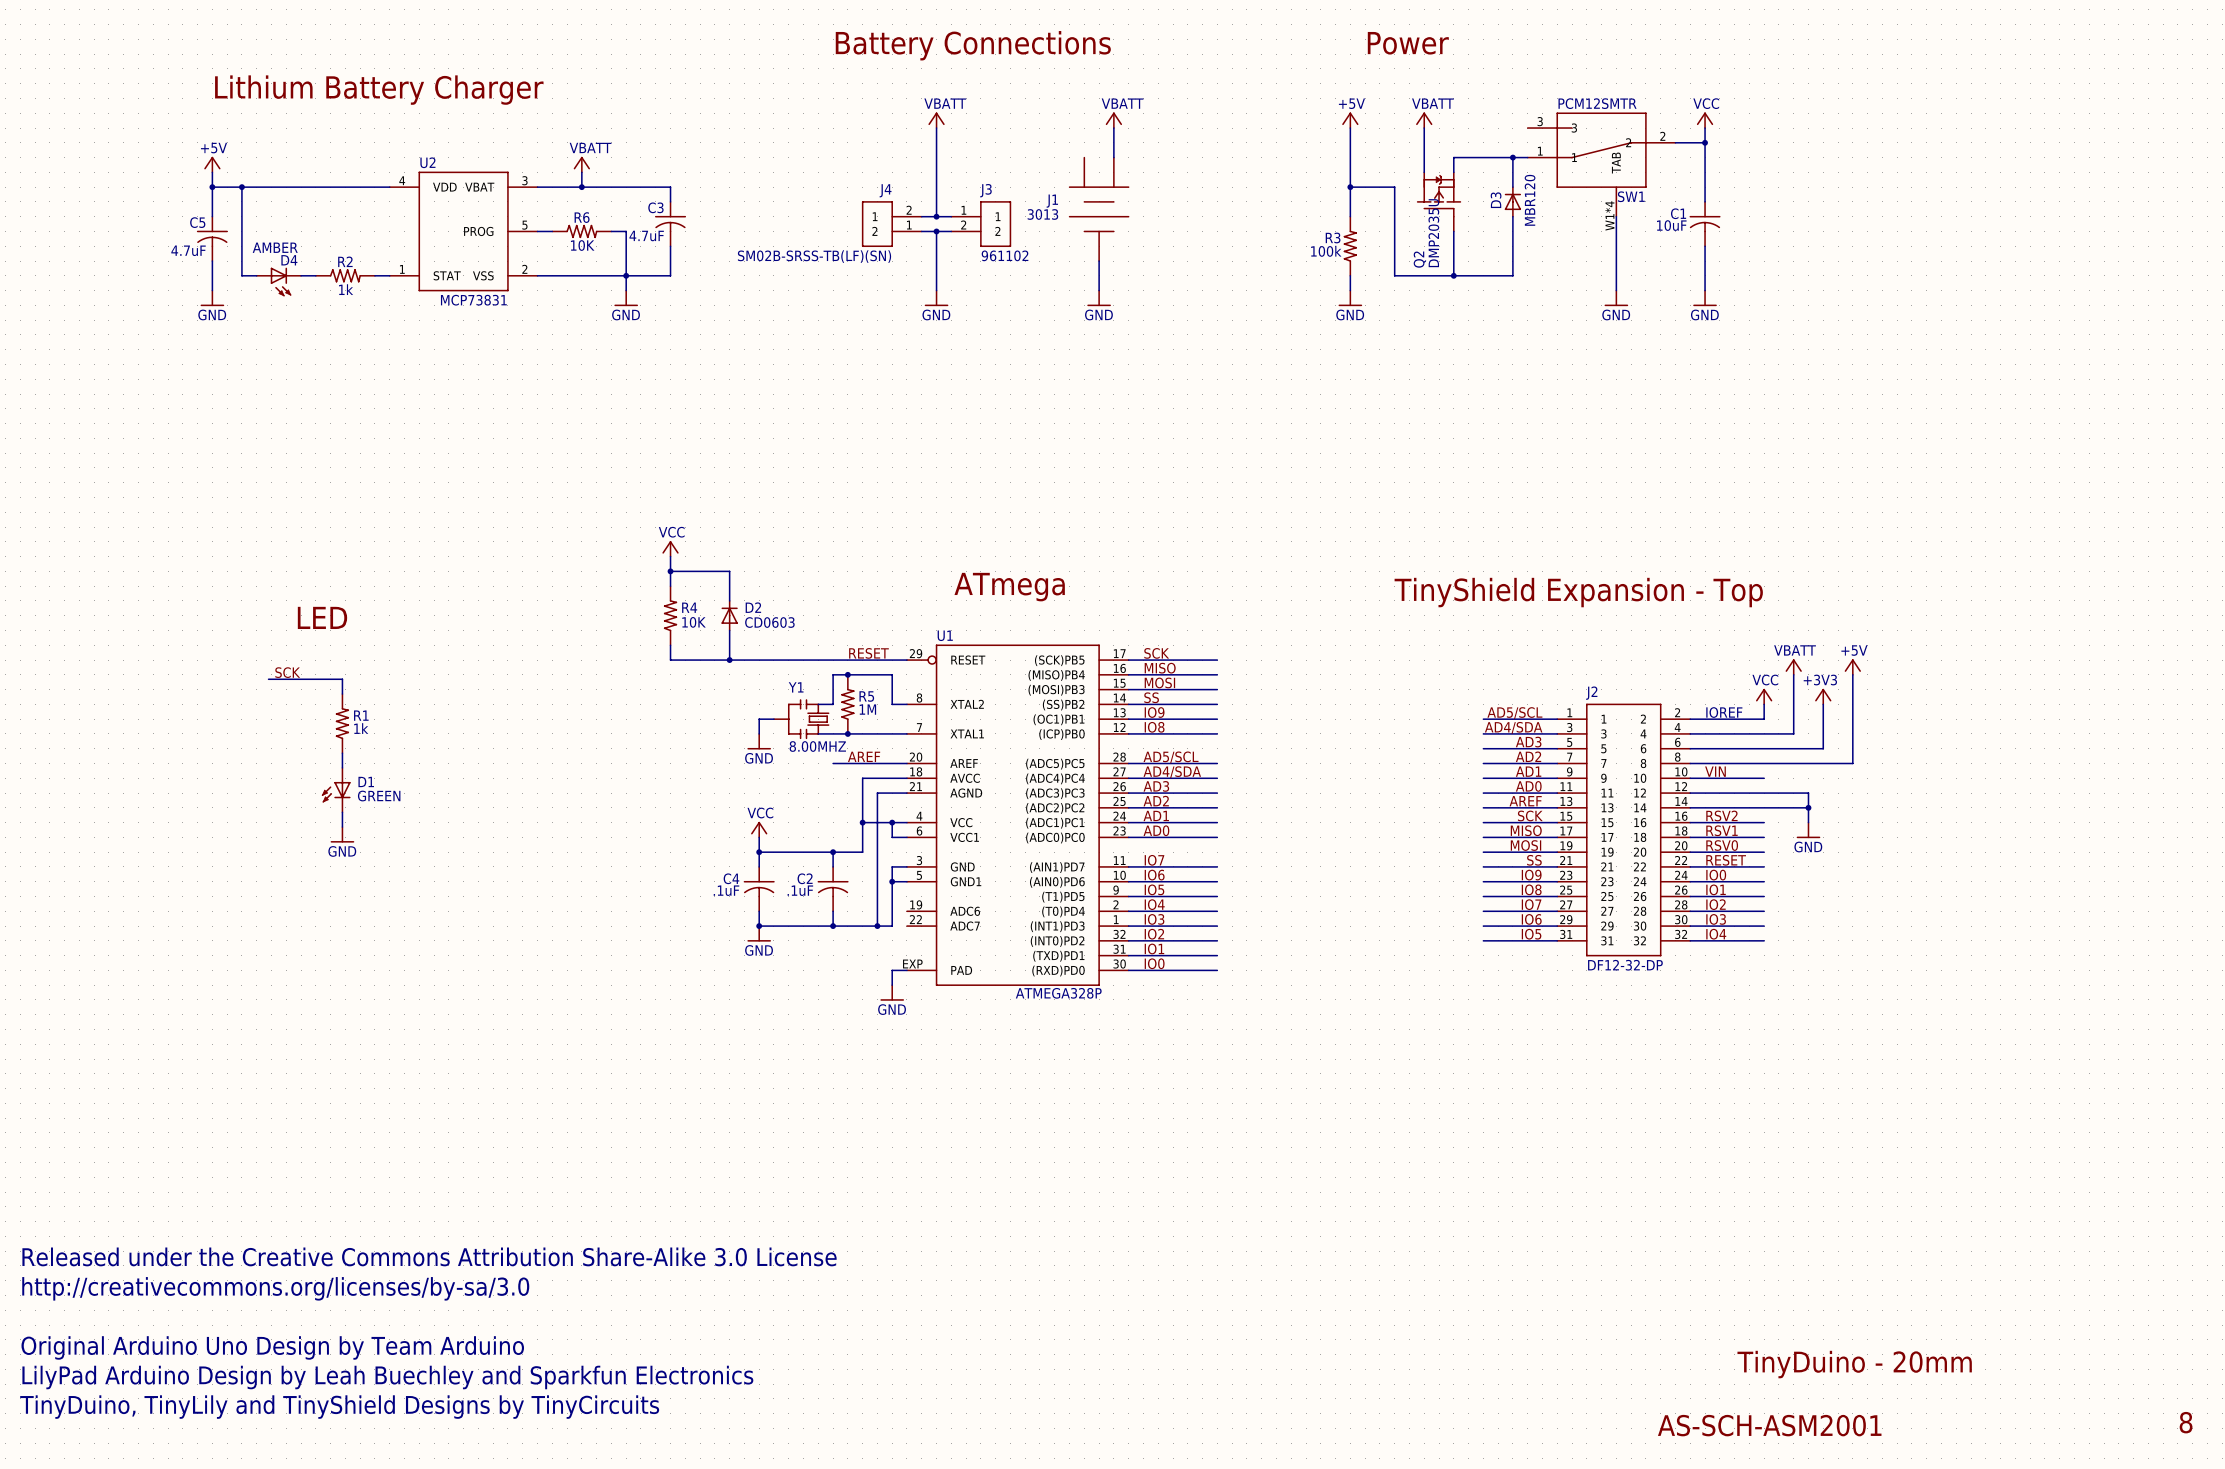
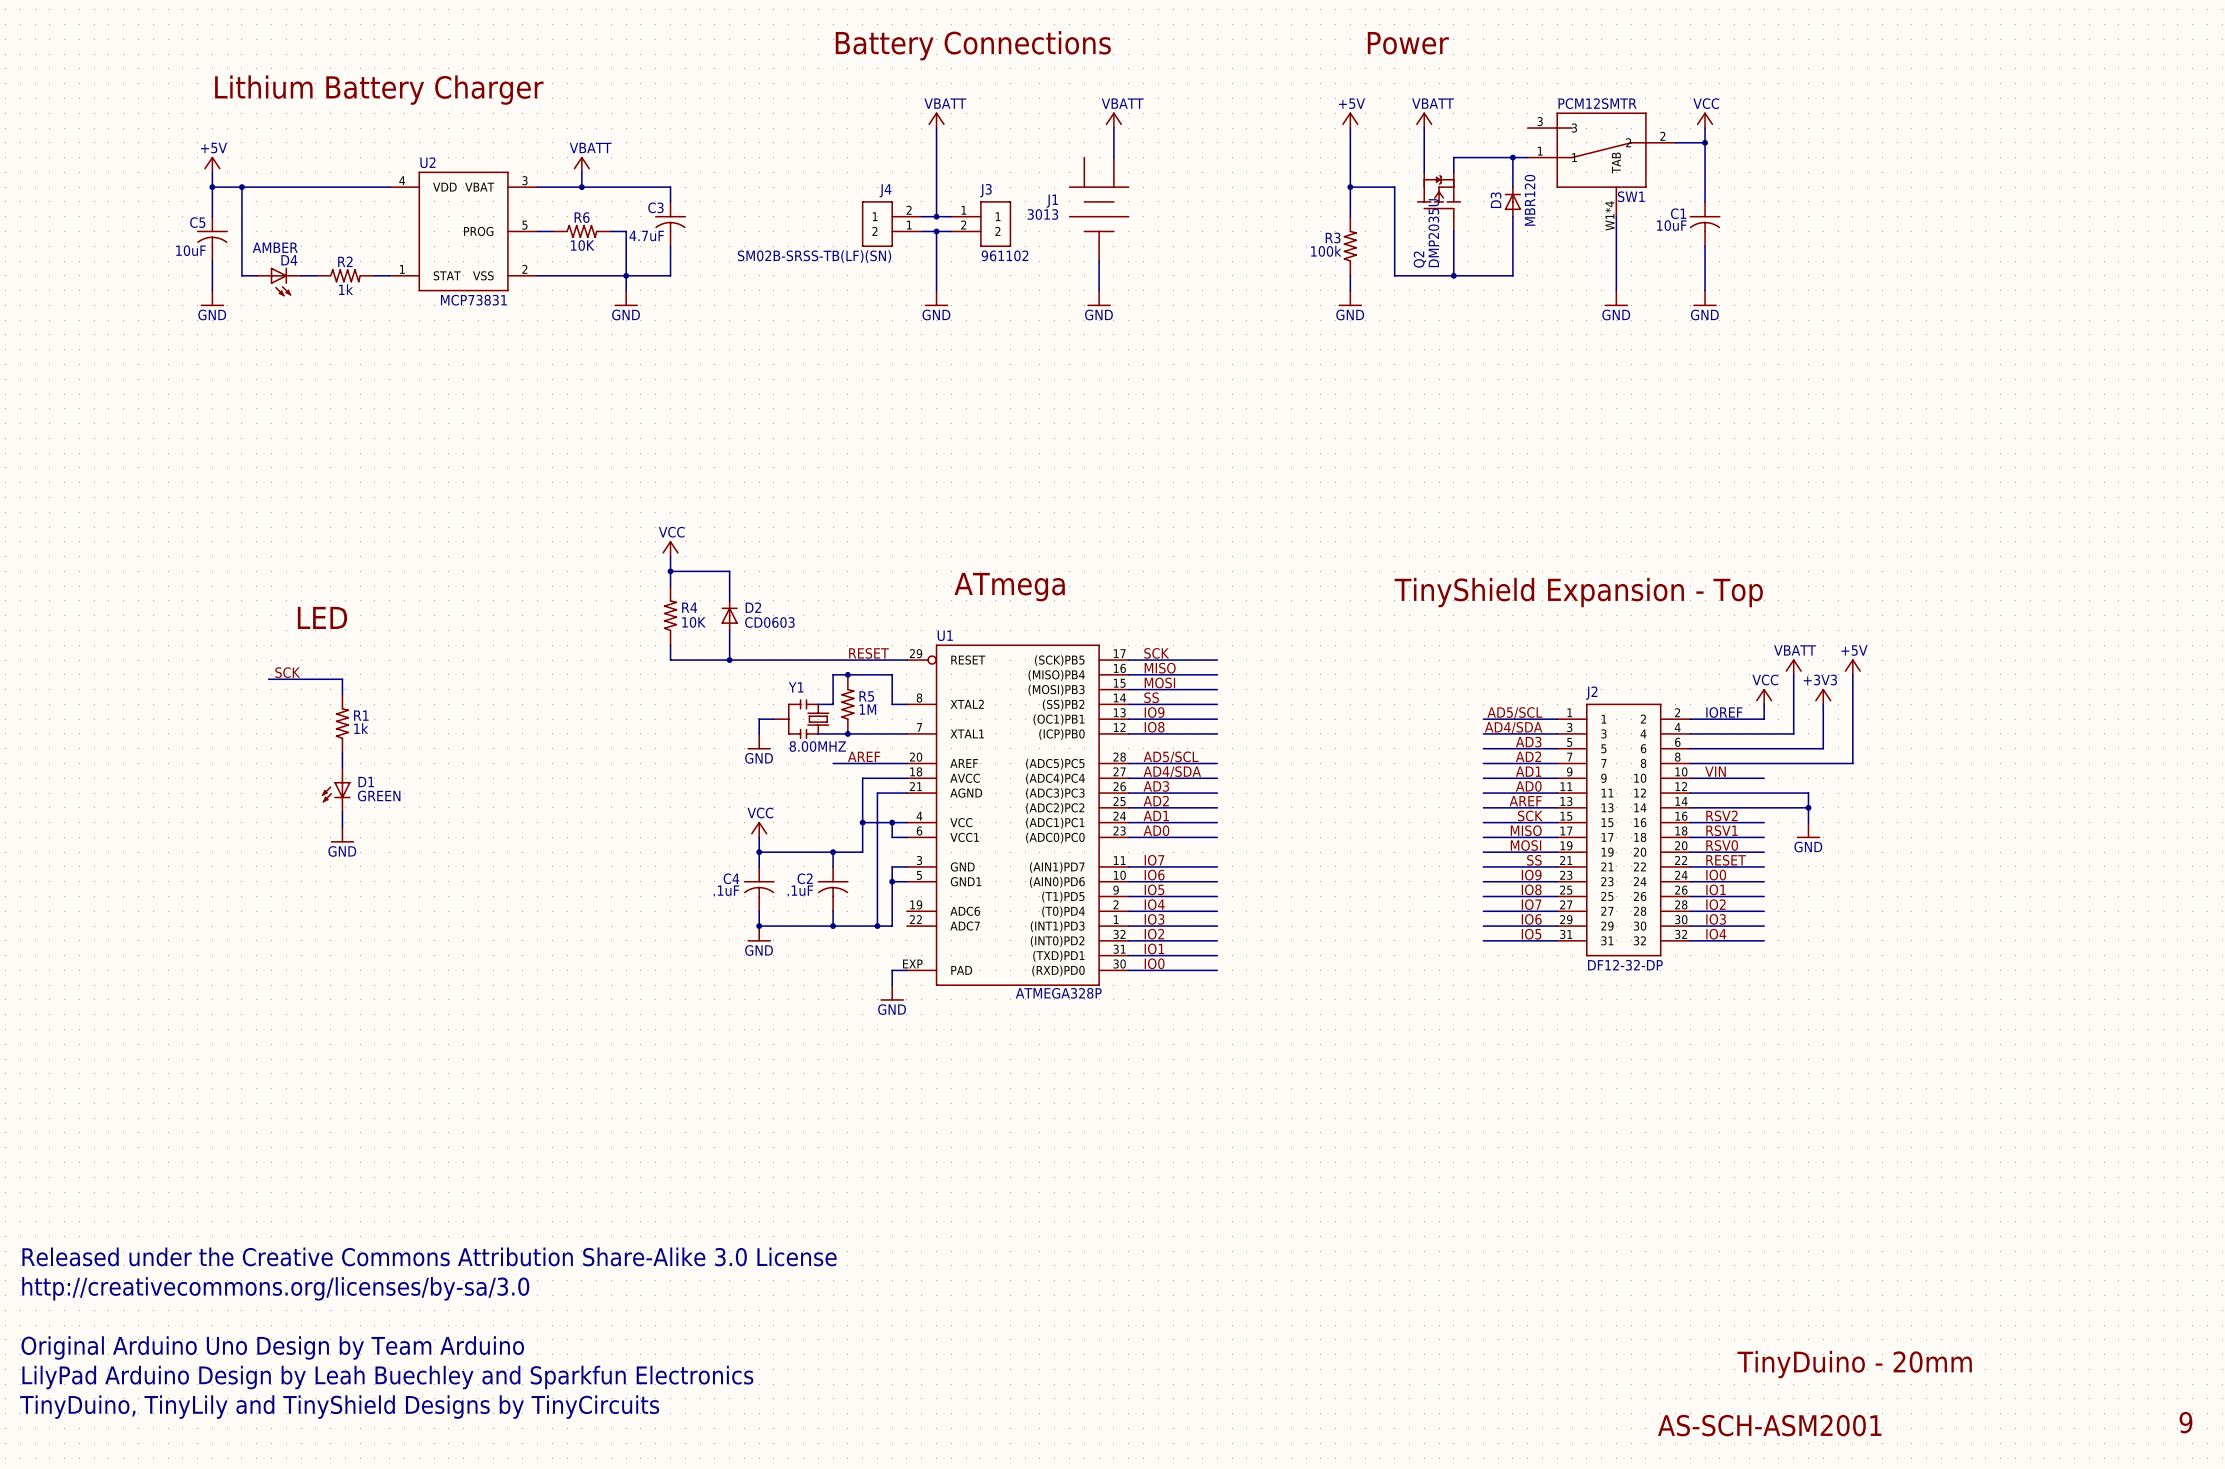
C5 value: 4.7uF (188, 250) -> 10uF (190, 250)
text: 8 (2186, 1422) -> 9 (2185, 1422)

